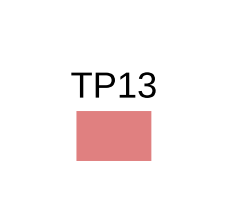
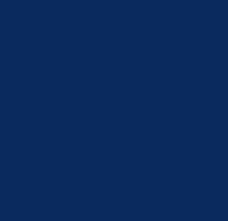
TP13: (113, 136) -> none

